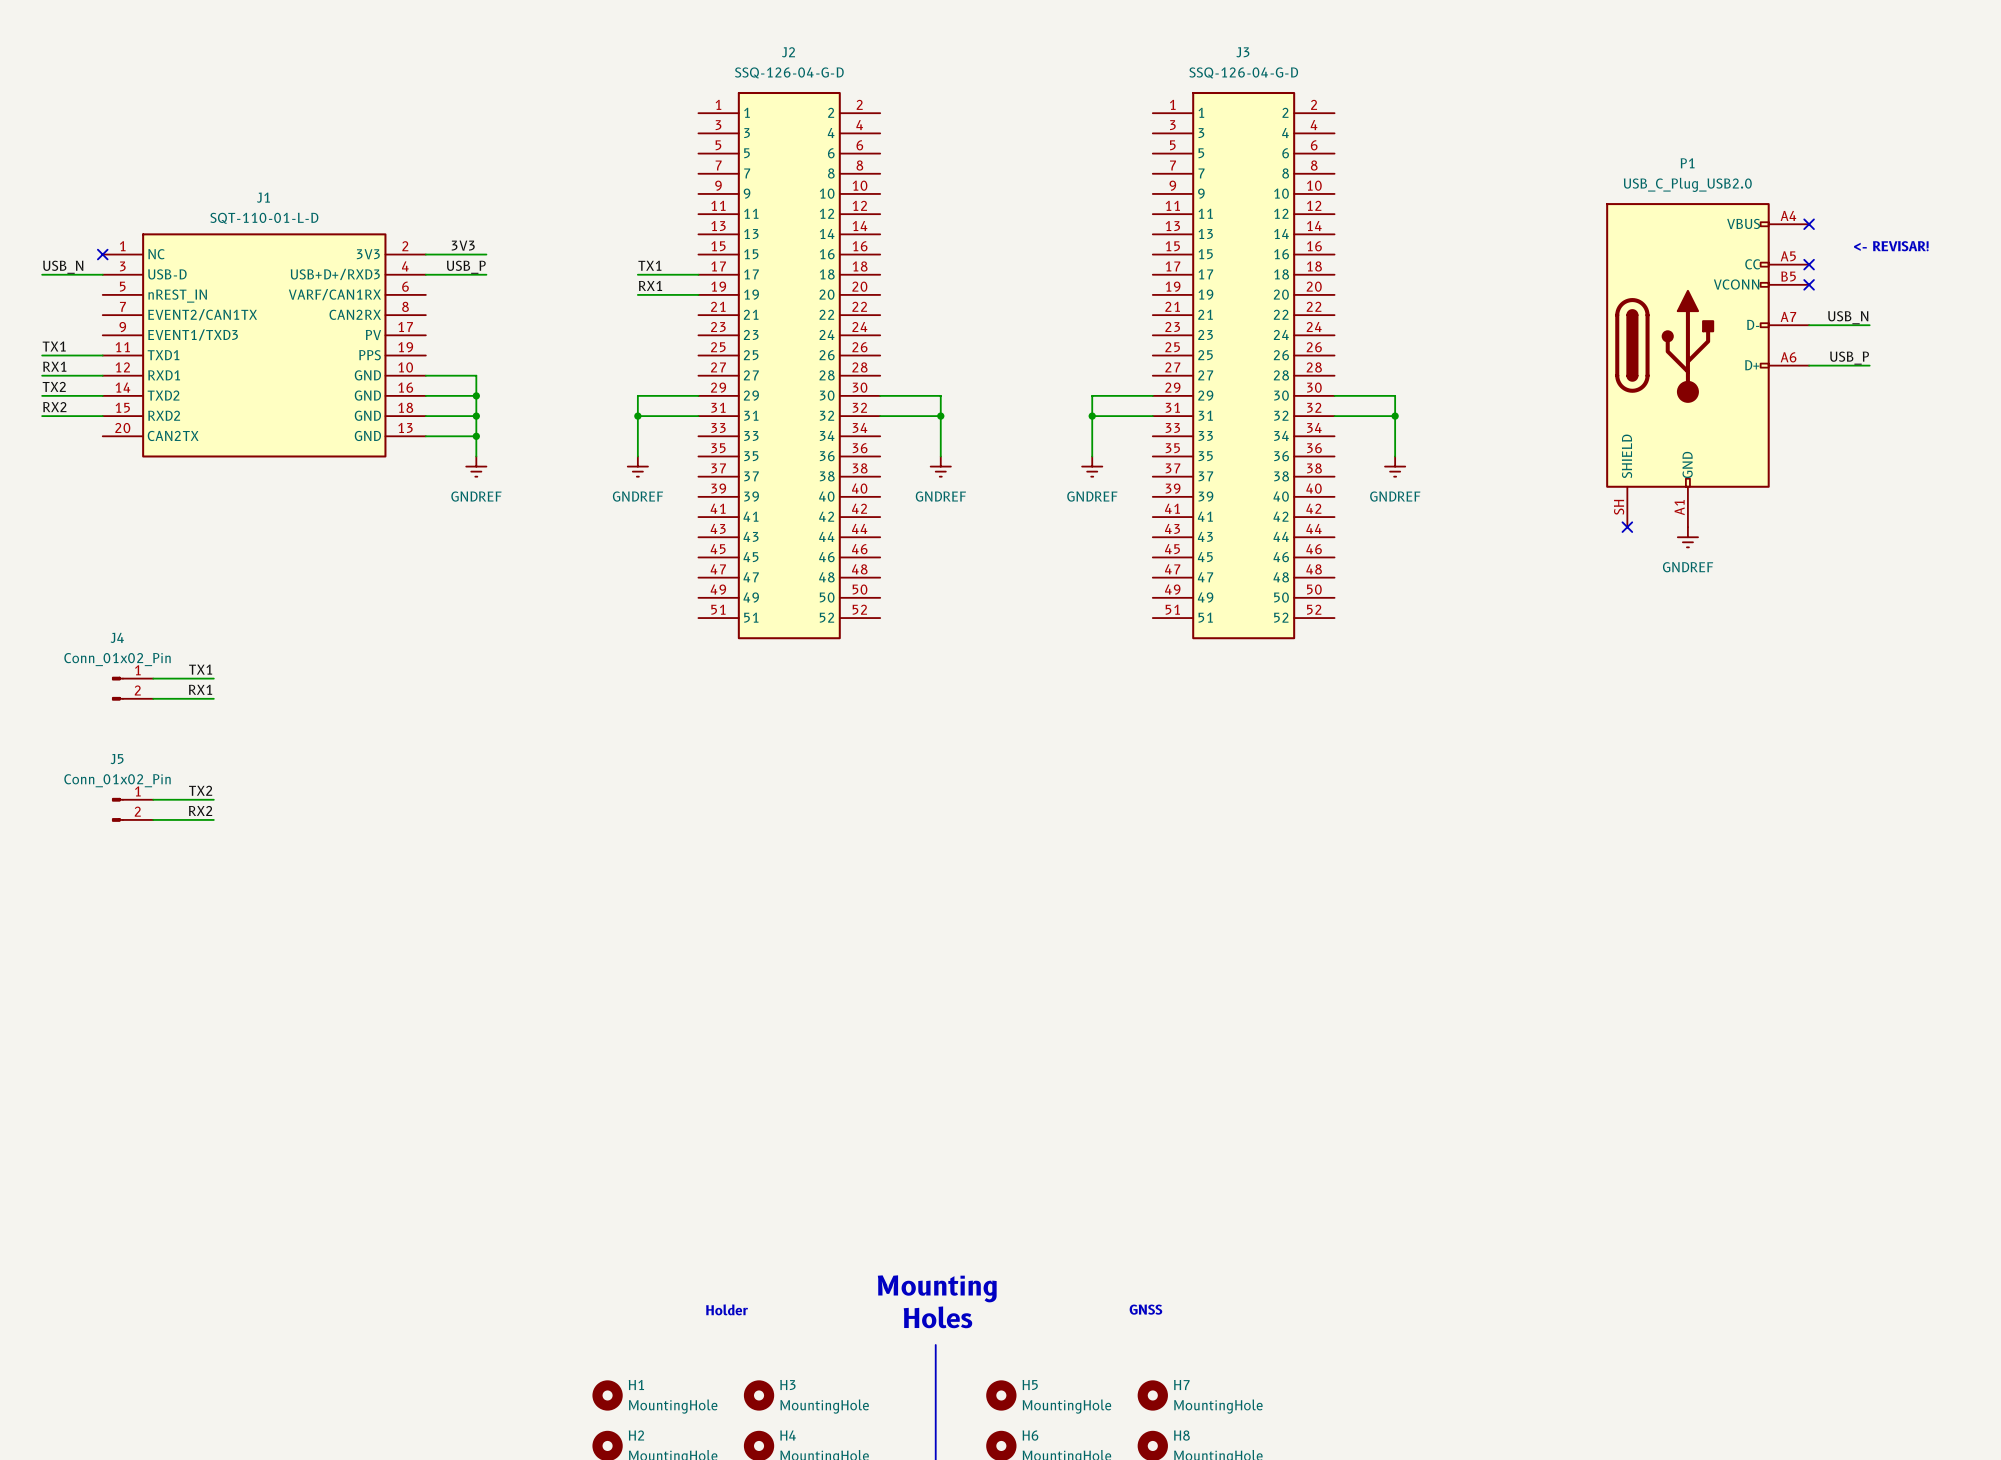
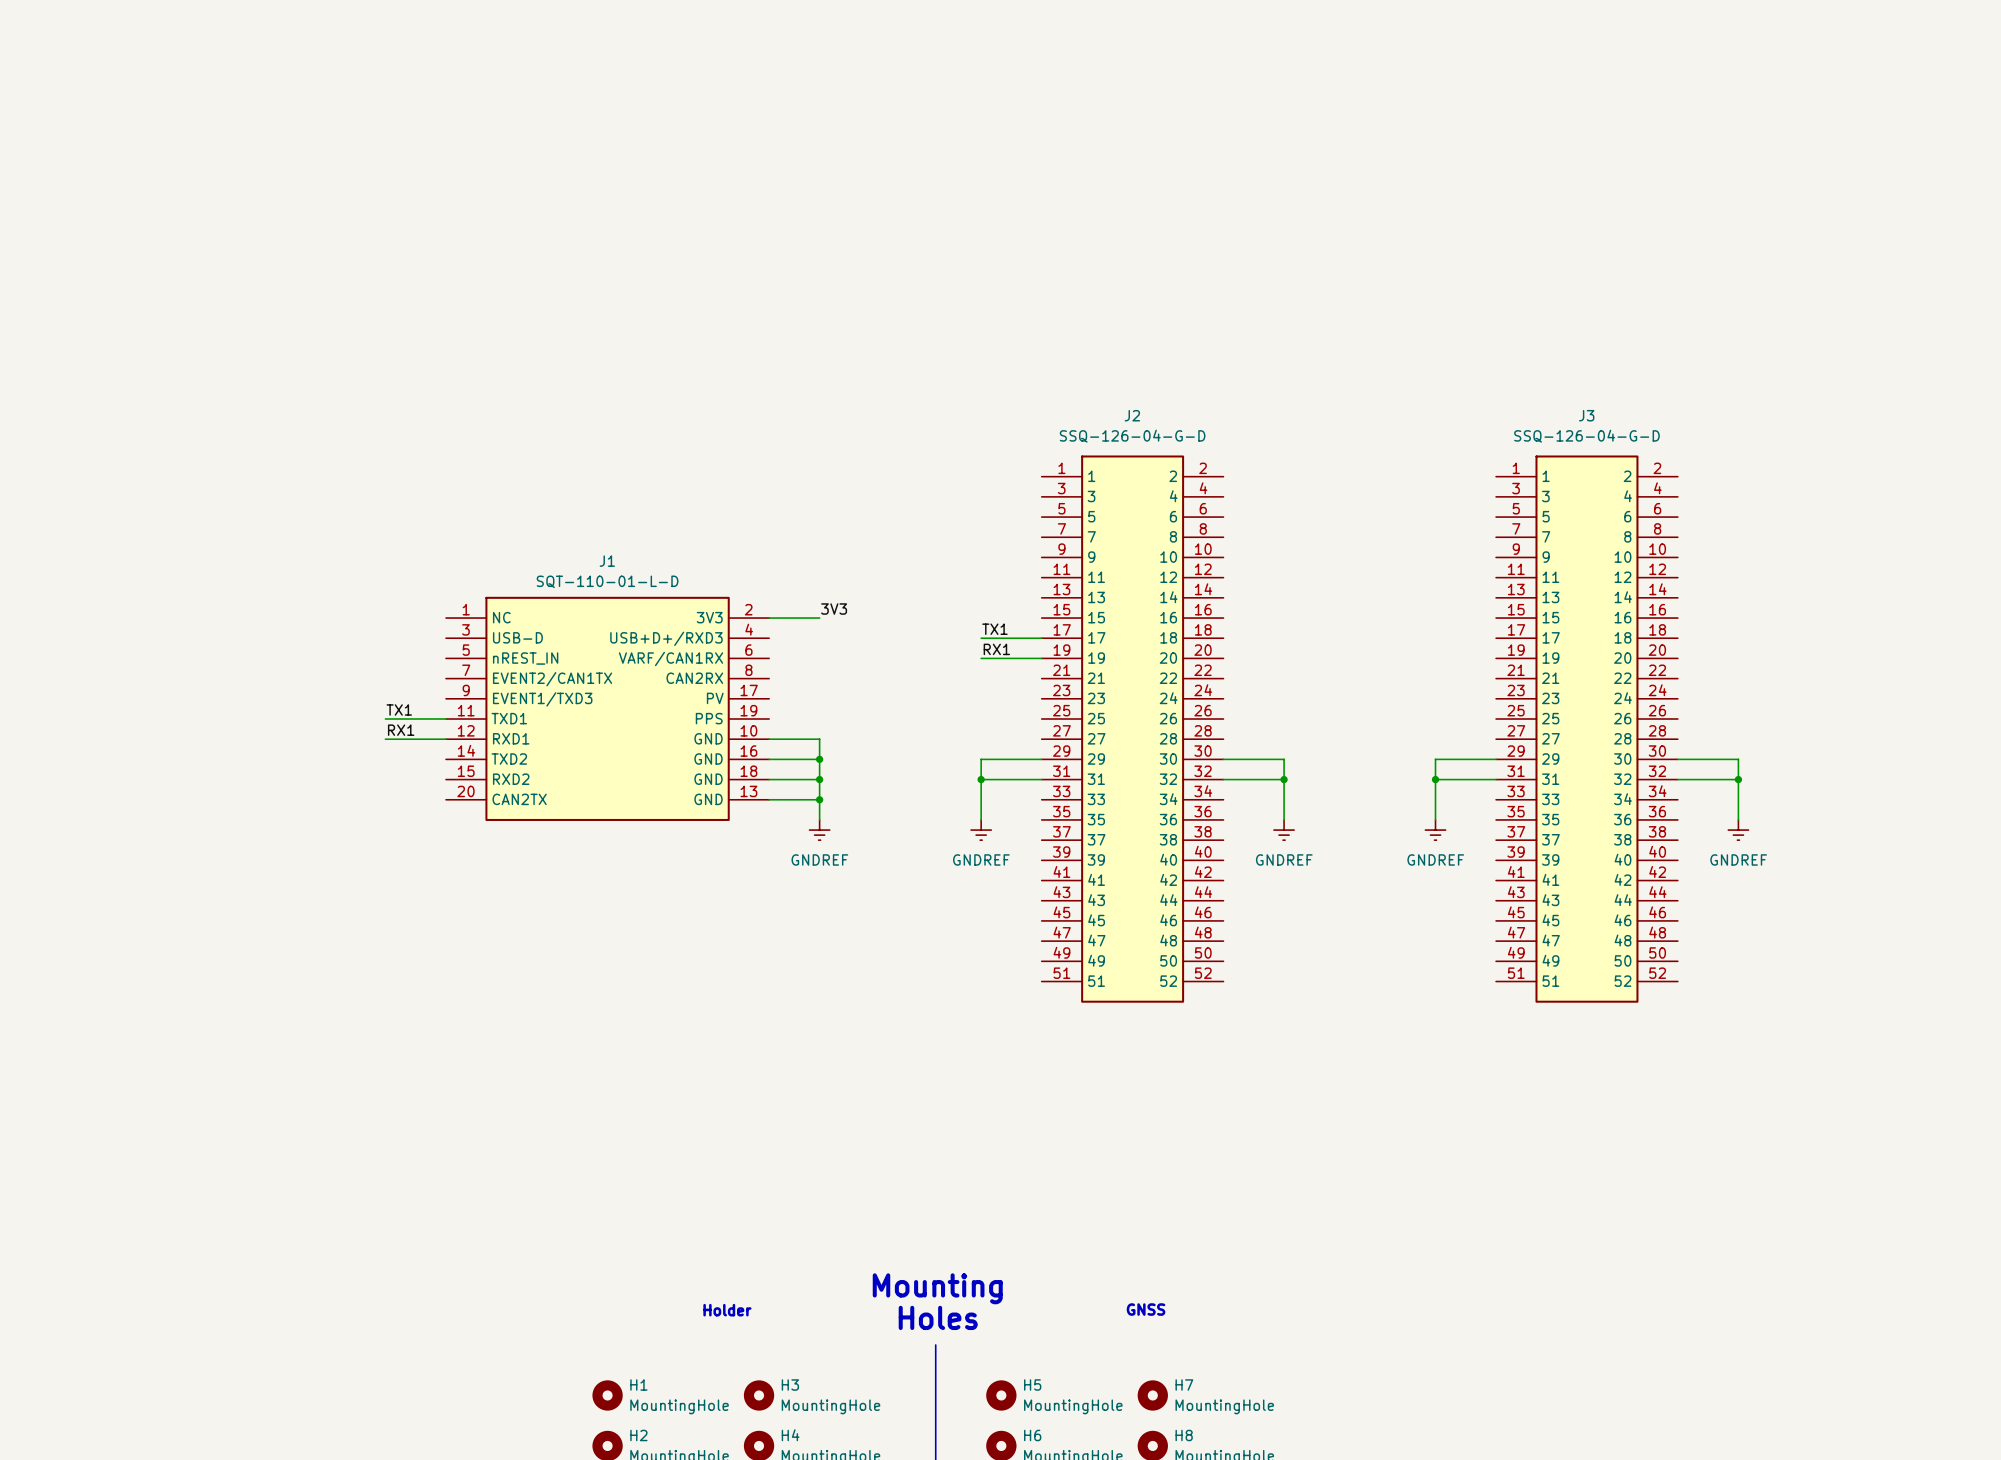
no-connect mark: (1809, 224) -> none
label: 3V3 (463, 245) -> none
text: <- REVISAR! (1891, 246) -> none
no-connect mark: (102, 254) -> none
wire: (425, 254) (486, 254) -> none
no-connect mark: (1809, 264) -> none
label: TX1 (649, 265) -> none
label: USB_N (63, 267) -> none
label: USB_P (466, 267) -> none
wire: (42, 274) (102, 274) -> none
wire: (425, 274) (486, 274) -> none
wire: (637, 274) (698, 274) -> none
no-connect mark: (1809, 284) -> none
label: RX1 (650, 285) -> none
wire: (637, 294) (698, 294) -> none
label: USB_N (1848, 317) -> none
wire: (1809, 325) (1869, 325) -> none
J1 position: (264, 345) -> (607, 708)
label: TX1 (54, 346) -> none
wire: (42, 355) (102, 355) -> none
label: USB_P (1849, 358) -> none
J2 position: (789, 365) -> (1132, 729)
J3 position: (1243, 365) -> (1586, 729)
P1: USB_C_Plug_USB2.0 (1707, 365) -> none
wire: (1809, 365) (1869, 365) -> none
label: RX1 (54, 366) -> none
wire: (42, 375) (102, 375) -> none
wire: (425, 375) (476, 375) (476, 456) -> none
label: TX2 (54, 386) -> none
wire: (42, 395) (102, 395) -> none
wire: (425, 395) (476, 395) -> none
junction: (476, 395) -> none
wire: (698, 395) (637, 395) (637, 456) -> none
wire: (880, 395) (940, 395) (940, 456) -> none
wire: (1152, 395) (1092, 395) (1092, 456) -> none
wire: (1334, 395) (1395, 395) (1395, 456) -> none
label: RX2 (54, 407) -> none
wire: (42, 416) (102, 416) -> none
wire: (425, 416) (476, 416) -> none
junction: (476, 416) -> none
wire: (637, 416) (698, 416) -> none
junction: (637, 416) -> none
wire: (880, 416) (940, 416) -> none
junction: (940, 416) -> none
wire: (1092, 416) (1152, 416) -> none
junction: (1092, 416) -> none
wire: (1334, 416) (1395, 416) -> none
junction: (1395, 416) -> none
wire: (425, 436) (476, 436) -> none
junction: (476, 436) -> none
power symbol: GNDREF (476, 466) -> none
power symbol: GNDREF (637, 466) -> none
power symbol: GNDREF (940, 466) -> none
power symbol: GNDREF (1092, 466) -> none
power symbol: GNDREF (1395, 466) -> none
no-connect mark: (1627, 527) -> none
power symbol: GNDREF (1687, 537) -> none
label: none -> 3V3 (834, 609)
label: none -> TX1 (994, 629)
wire: none -> (981, 638) (1041, 638)
label: none -> RX1 (996, 649)
wire: none -> (981, 658) (1041, 658)
label position: TX1 (200, 669) -> TX1 (399, 709)
wire: (153, 678) (213, 678) -> none
J4: Conn_01x02_Pin (132, 688) -> none
label position: RX1 (200, 689) -> RX1 (401, 730)
wire: (153, 698) (213, 698) -> none
wire: none -> (385, 719) (446, 719)
wire: none -> (385, 739) (446, 739)
wire: none -> (769, 739) (819, 739) (819, 819)
wire: none -> (769, 759) (819, 759)
junction: none -> (819, 759)
wire: none -> (1041, 759) (981, 759) (981, 819)
wire: none -> (1223, 759) (1284, 759) (1284, 819)
wire: none -> (1496, 759) (1435, 759) (1435, 819)
wire: none -> (1677, 759) (1738, 759) (1738, 819)
wire: none -> (769, 779) (819, 779)
junction: none -> (819, 779)
wire: none -> (981, 779) (1041, 779)
junction: none -> (981, 779)
wire: none -> (1223, 779) (1284, 779)
junction: none -> (1284, 779)
wire: none -> (1435, 779) (1496, 779)
junction: none -> (1435, 779)
wire: none -> (1677, 779) (1738, 779)
junction: none -> (1738, 779)
label: TX2 (200, 790) -> none
wire: (153, 799) (213, 799) -> none
wire: none -> (769, 799) (819, 799)
junction: none -> (819, 799)
J5: Conn_01x02_Pin (132, 809) -> none
label: RX2 (200, 810) -> none
wire: (153, 819) (213, 819) -> none
power symbol: none -> GNDREF (819, 830)
power symbol: none -> GNDREF (981, 830)
power symbol: none -> GNDREF (1284, 830)
power symbol: none -> GNDREF (1435, 830)
power symbol: none -> GNDREF (1738, 830)

